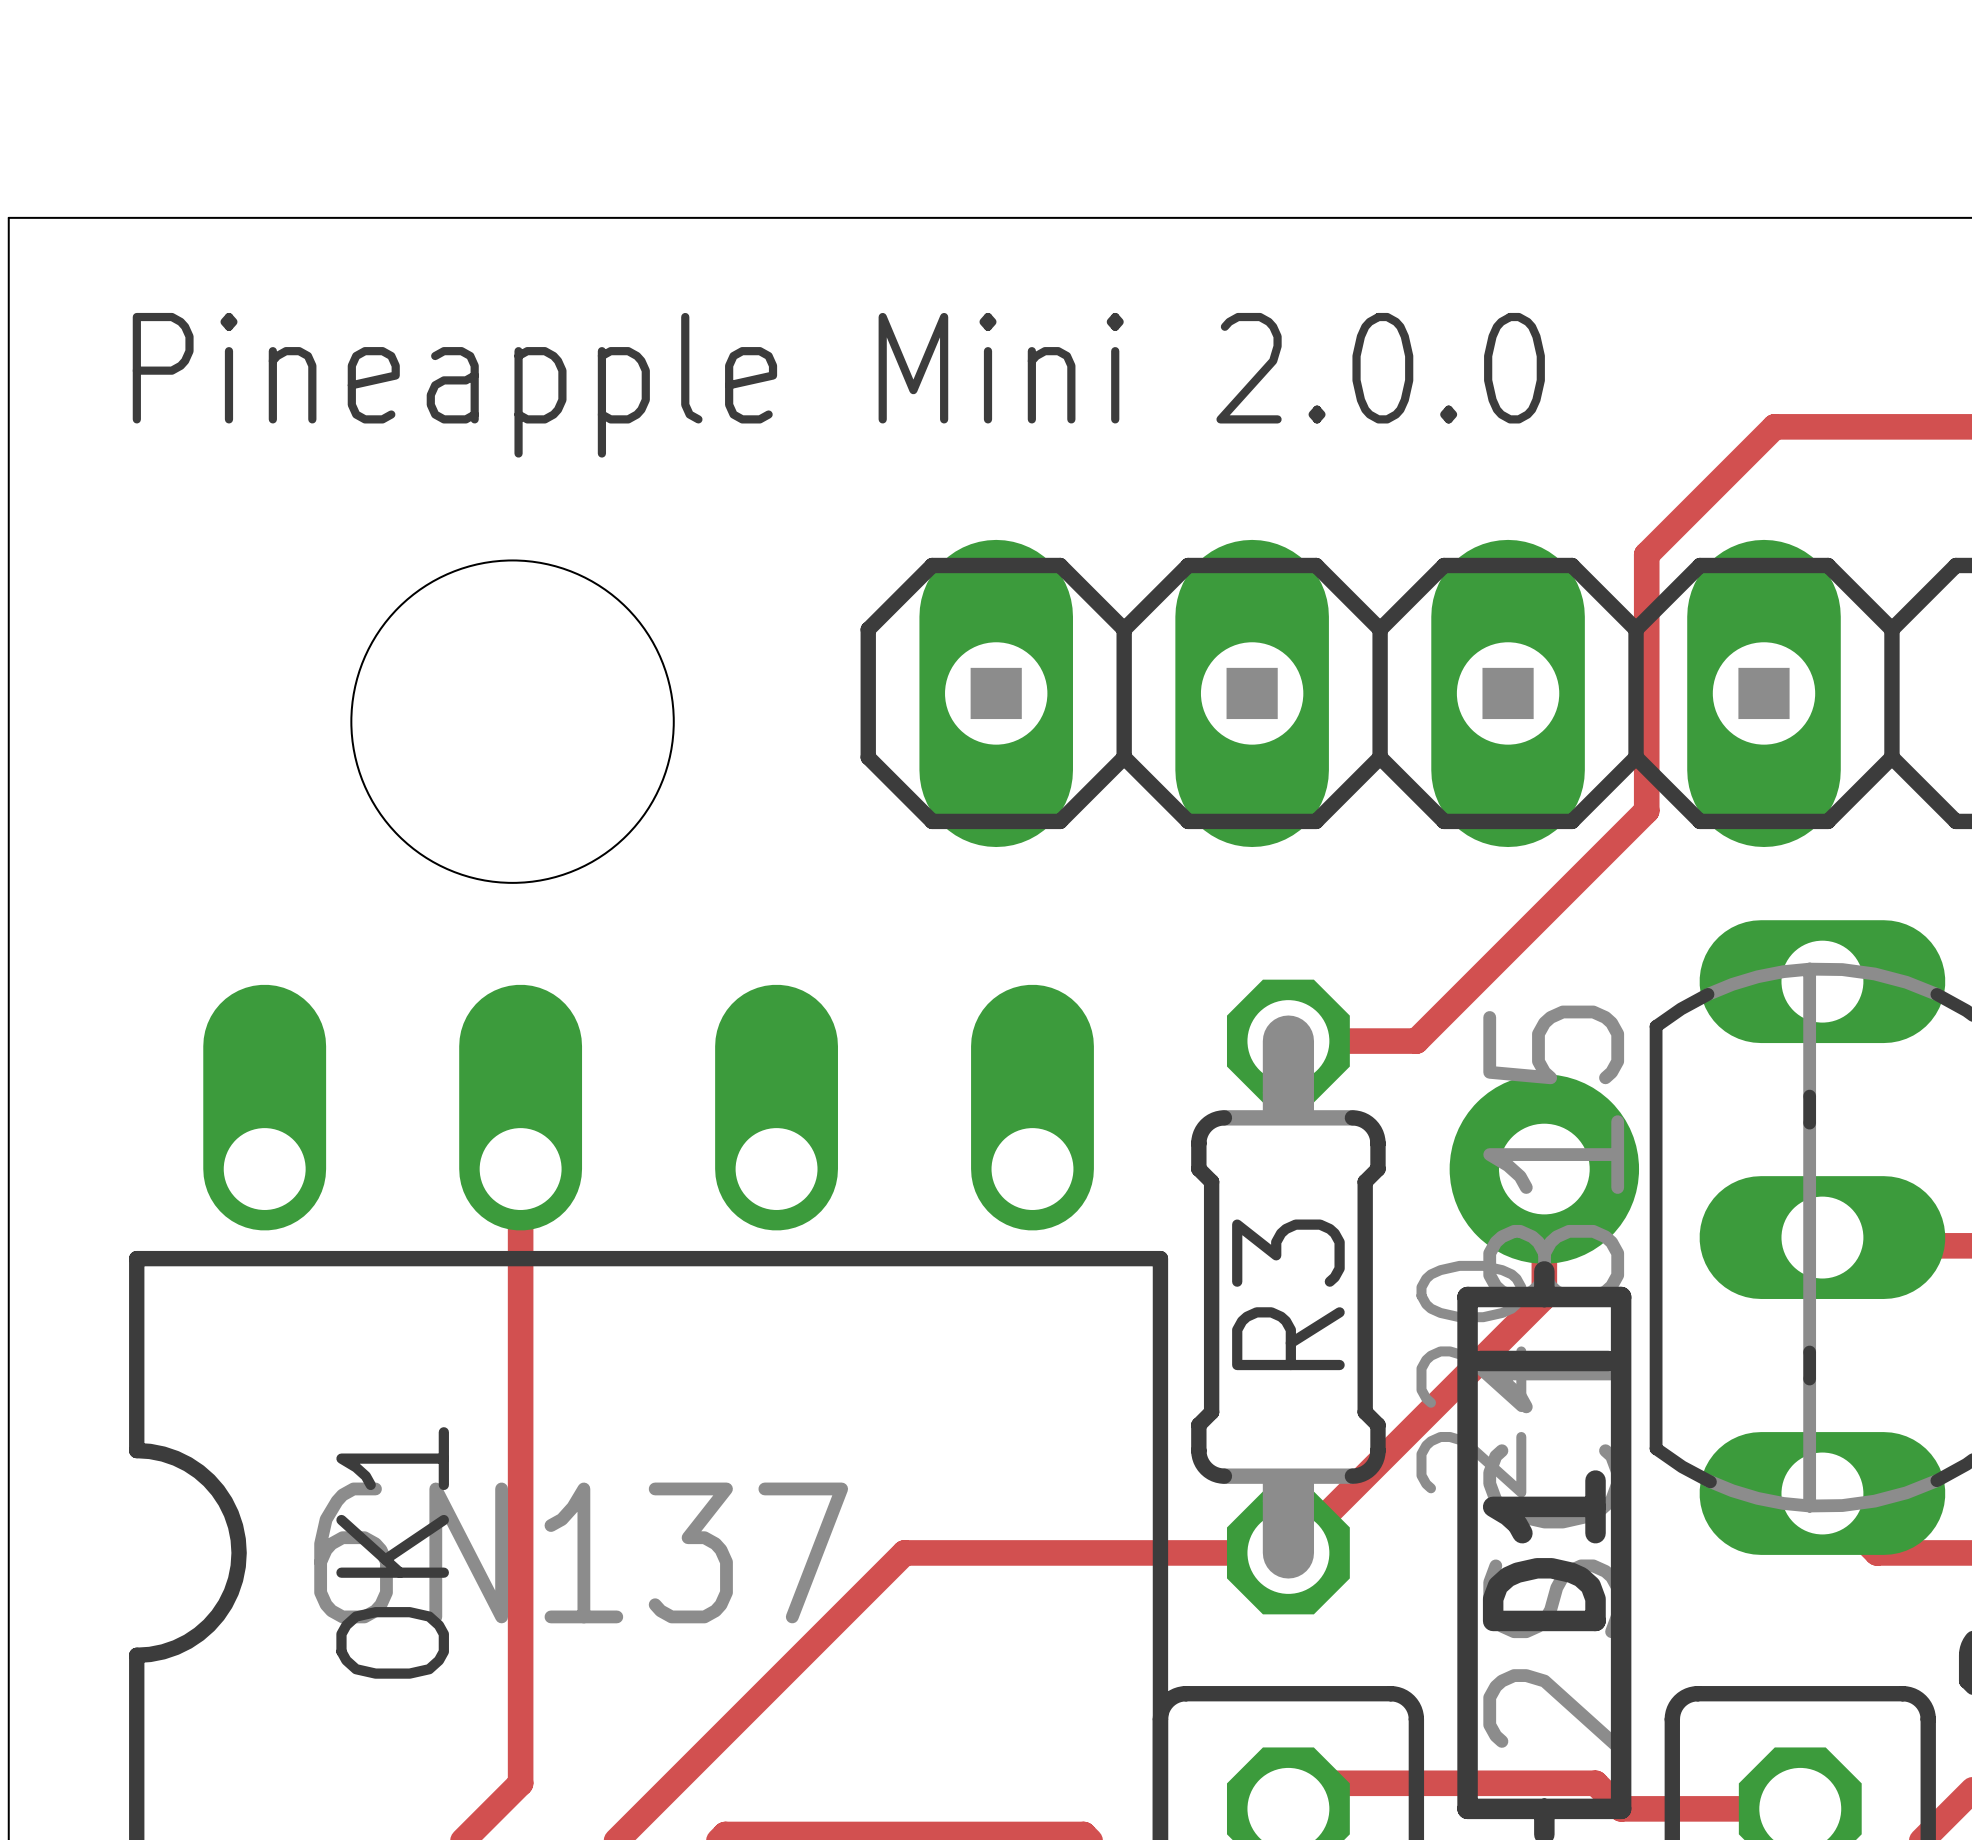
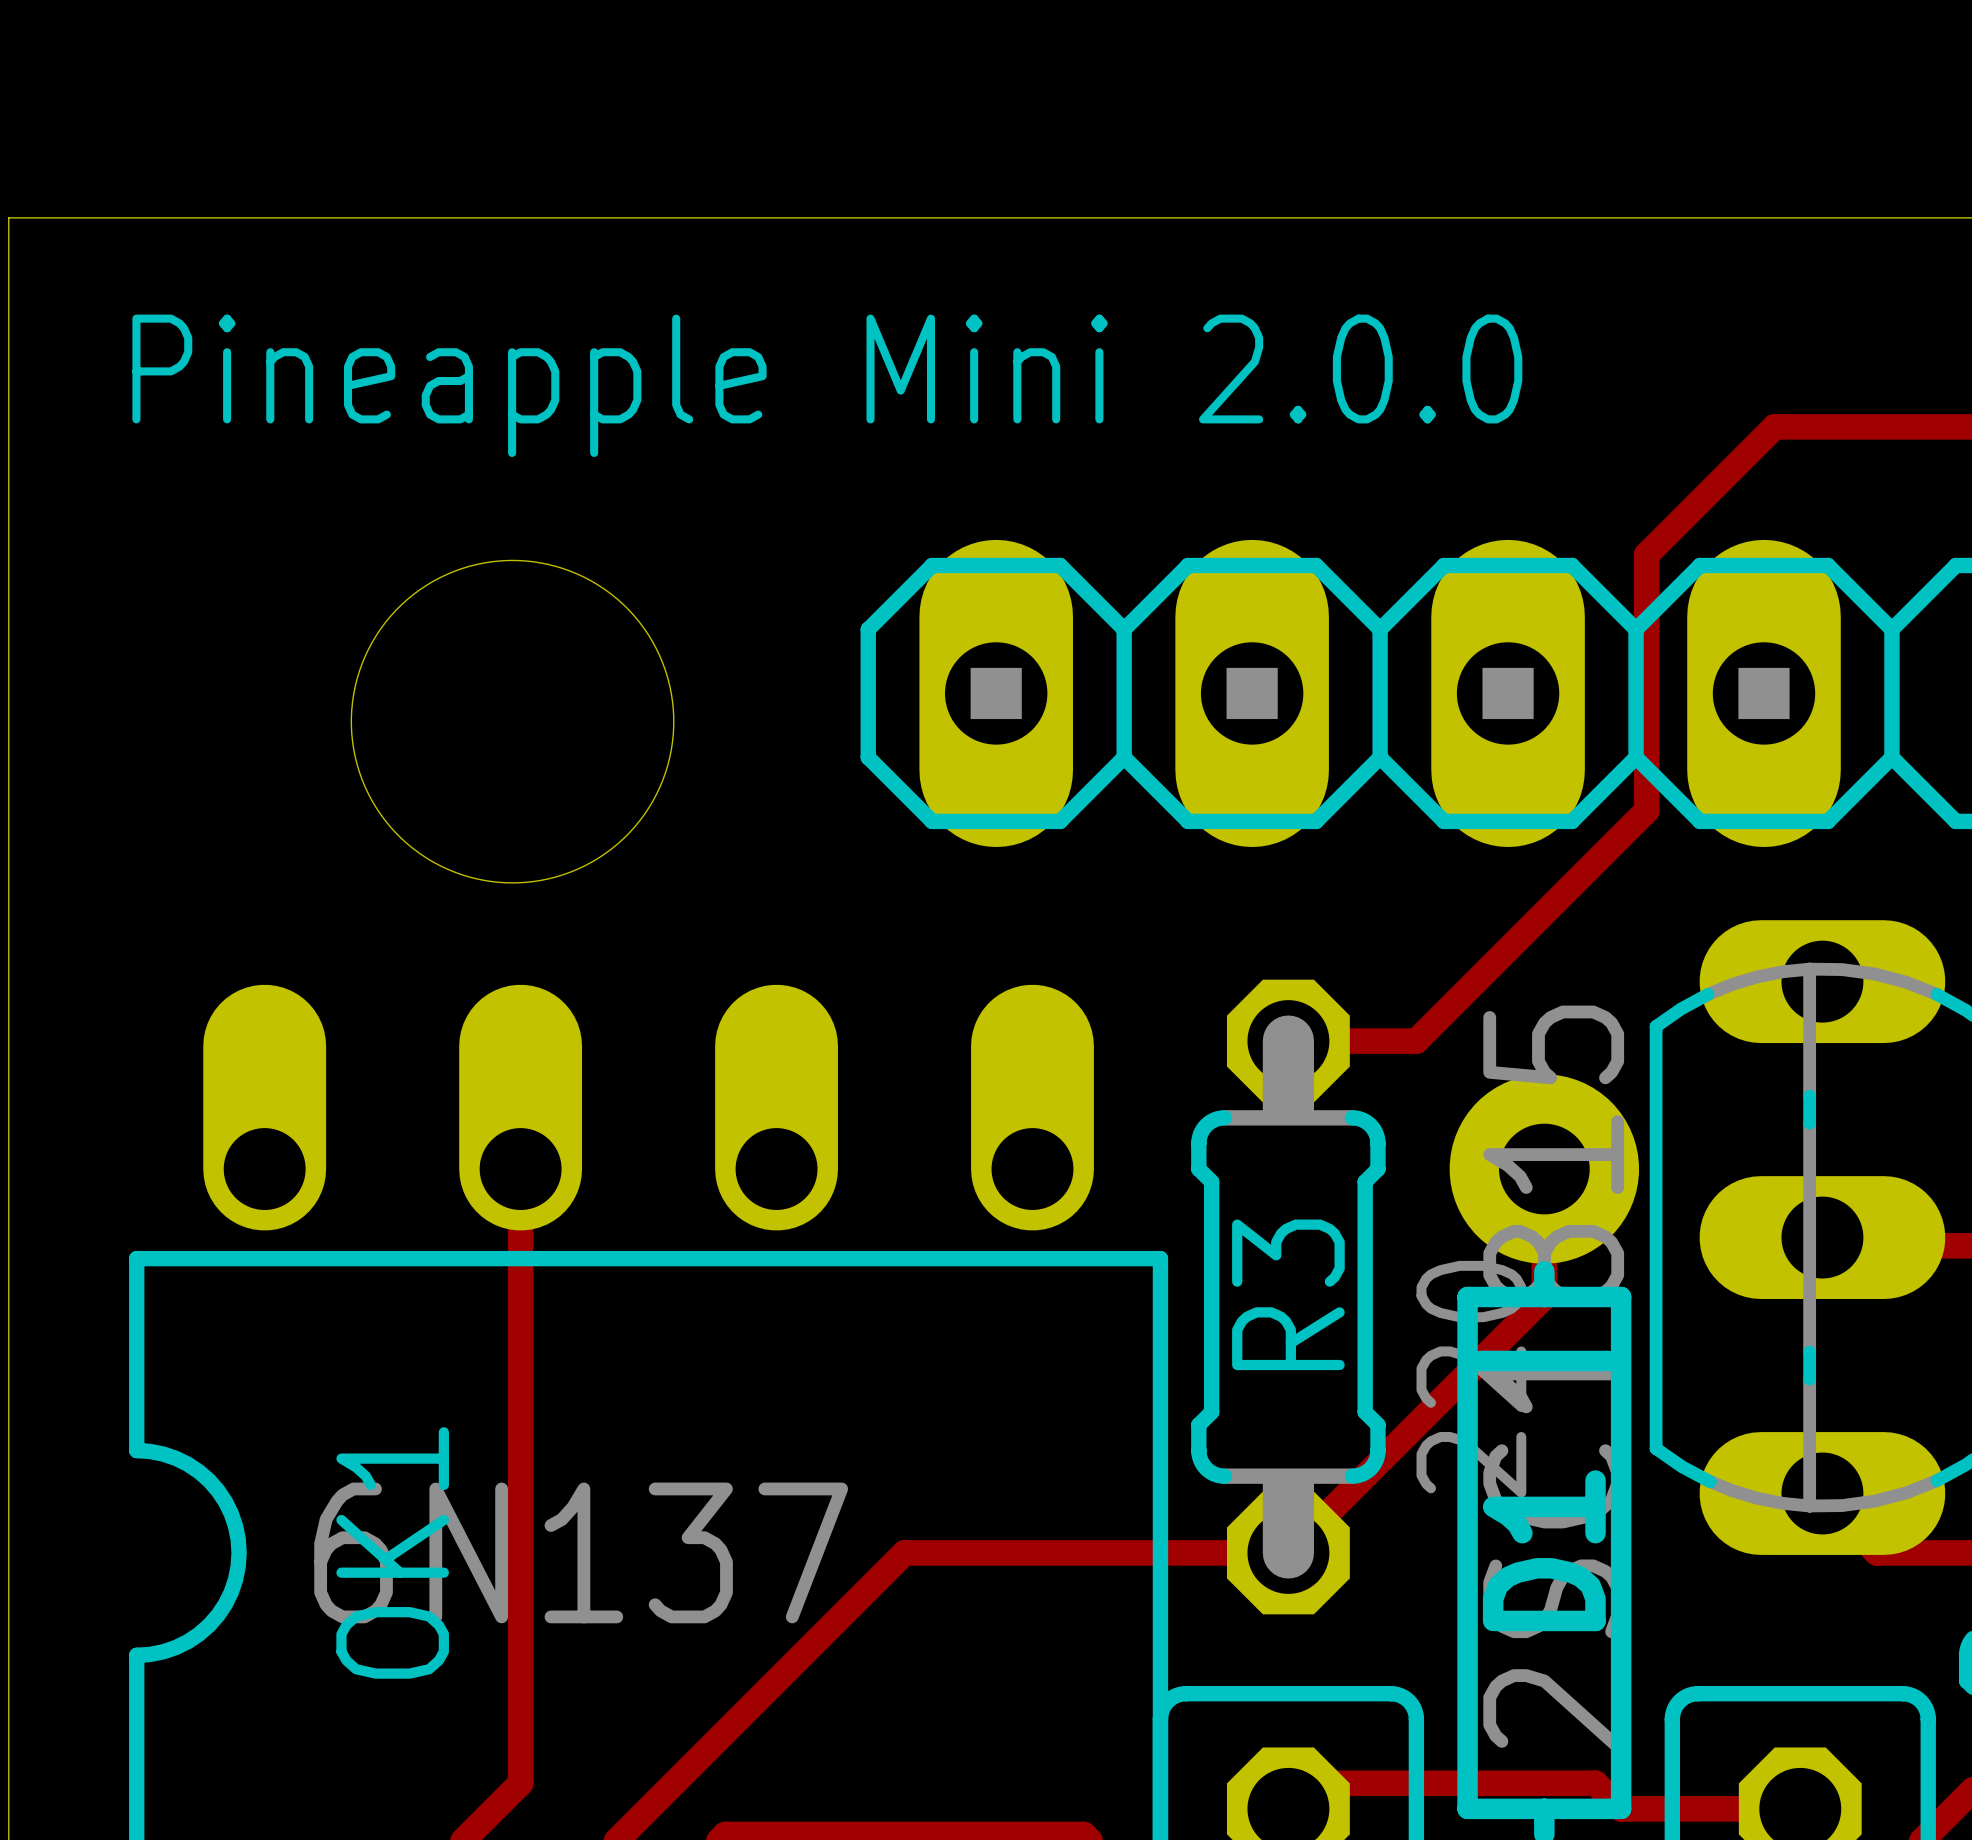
text position: Pineapple Mini 2.0.0 (838, 385) -> Pineapple Mini 2.0.0 (827, 385)

